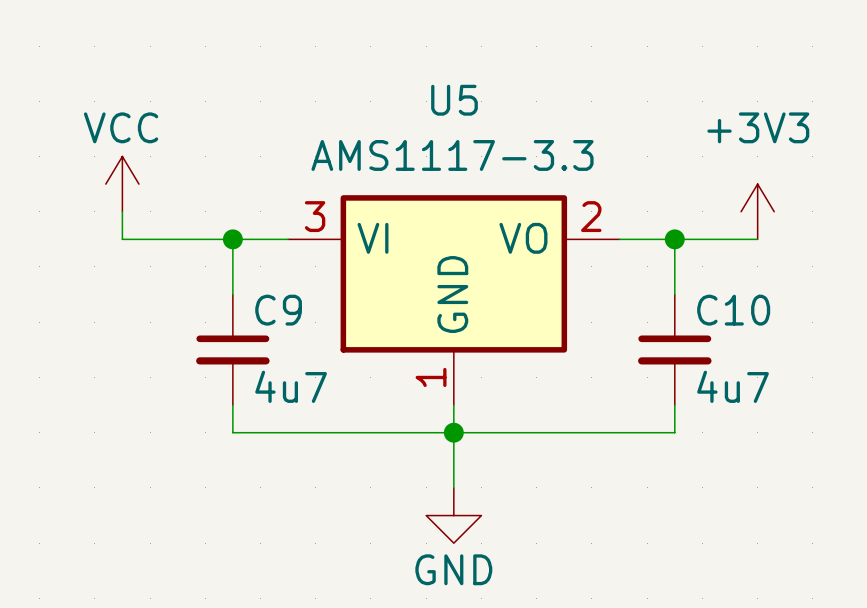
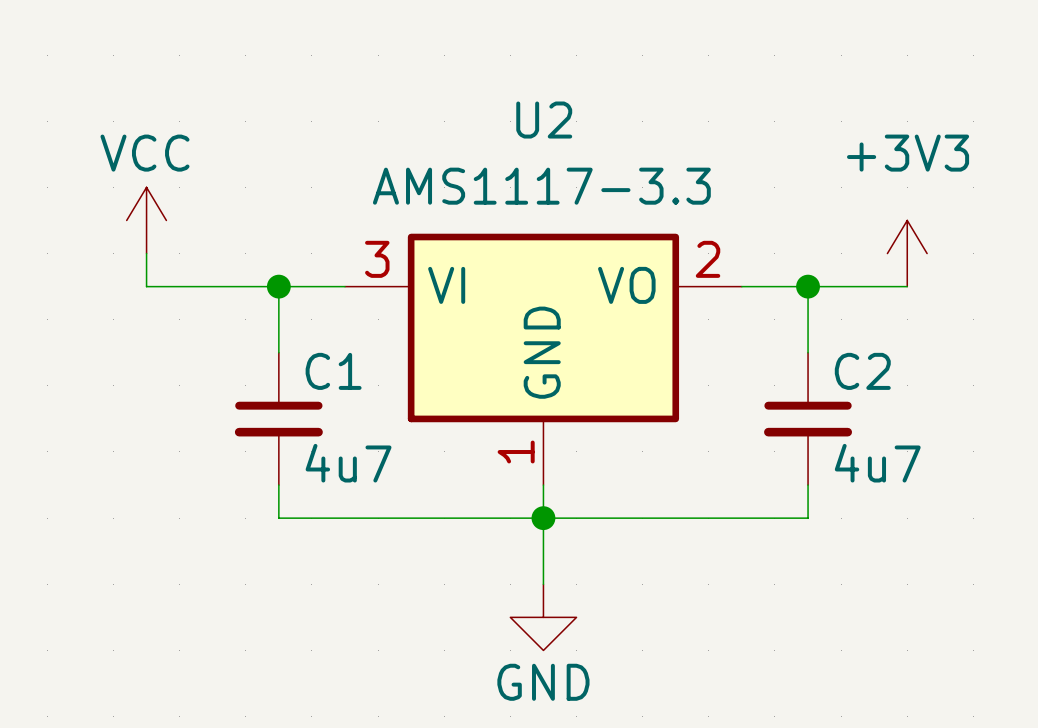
U5 name: U5 (454, 100) -> U2 (544, 120)
C9 name: C9 (278, 310) -> C1 (333, 371)
C10 name: C10 (733, 310) -> C2 (862, 371)

